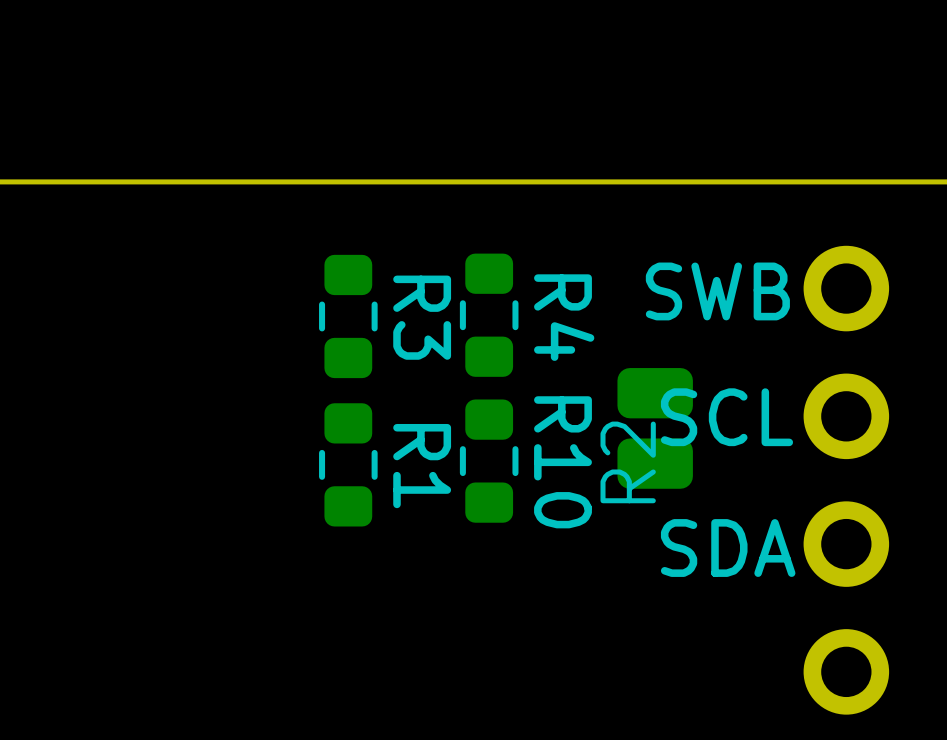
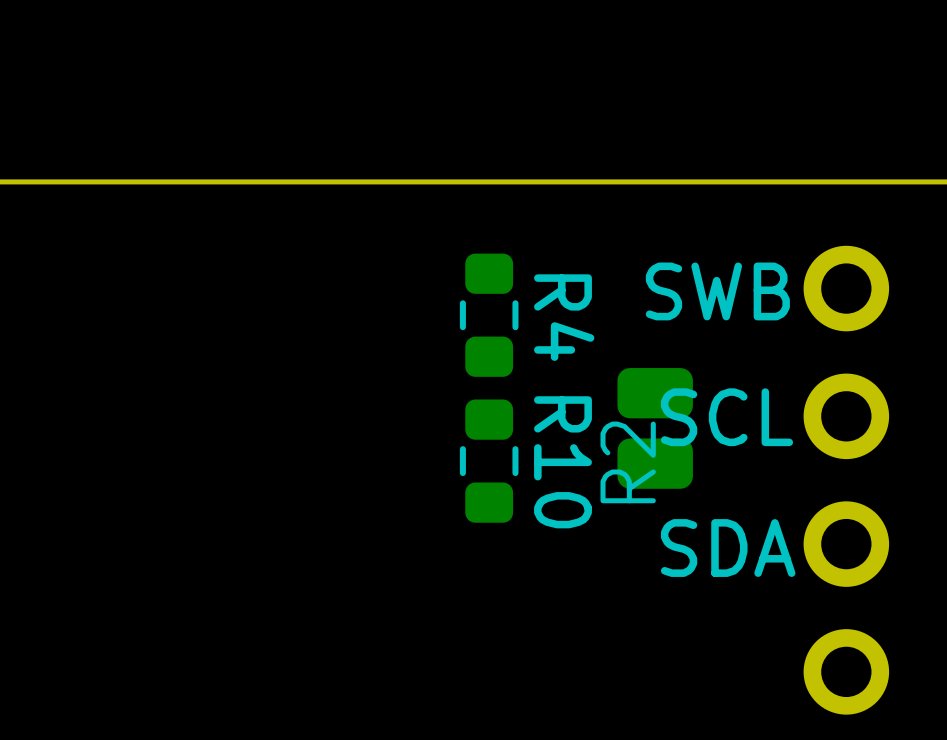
R3: (348, 316) -> none
R1: (348, 464) -> none

